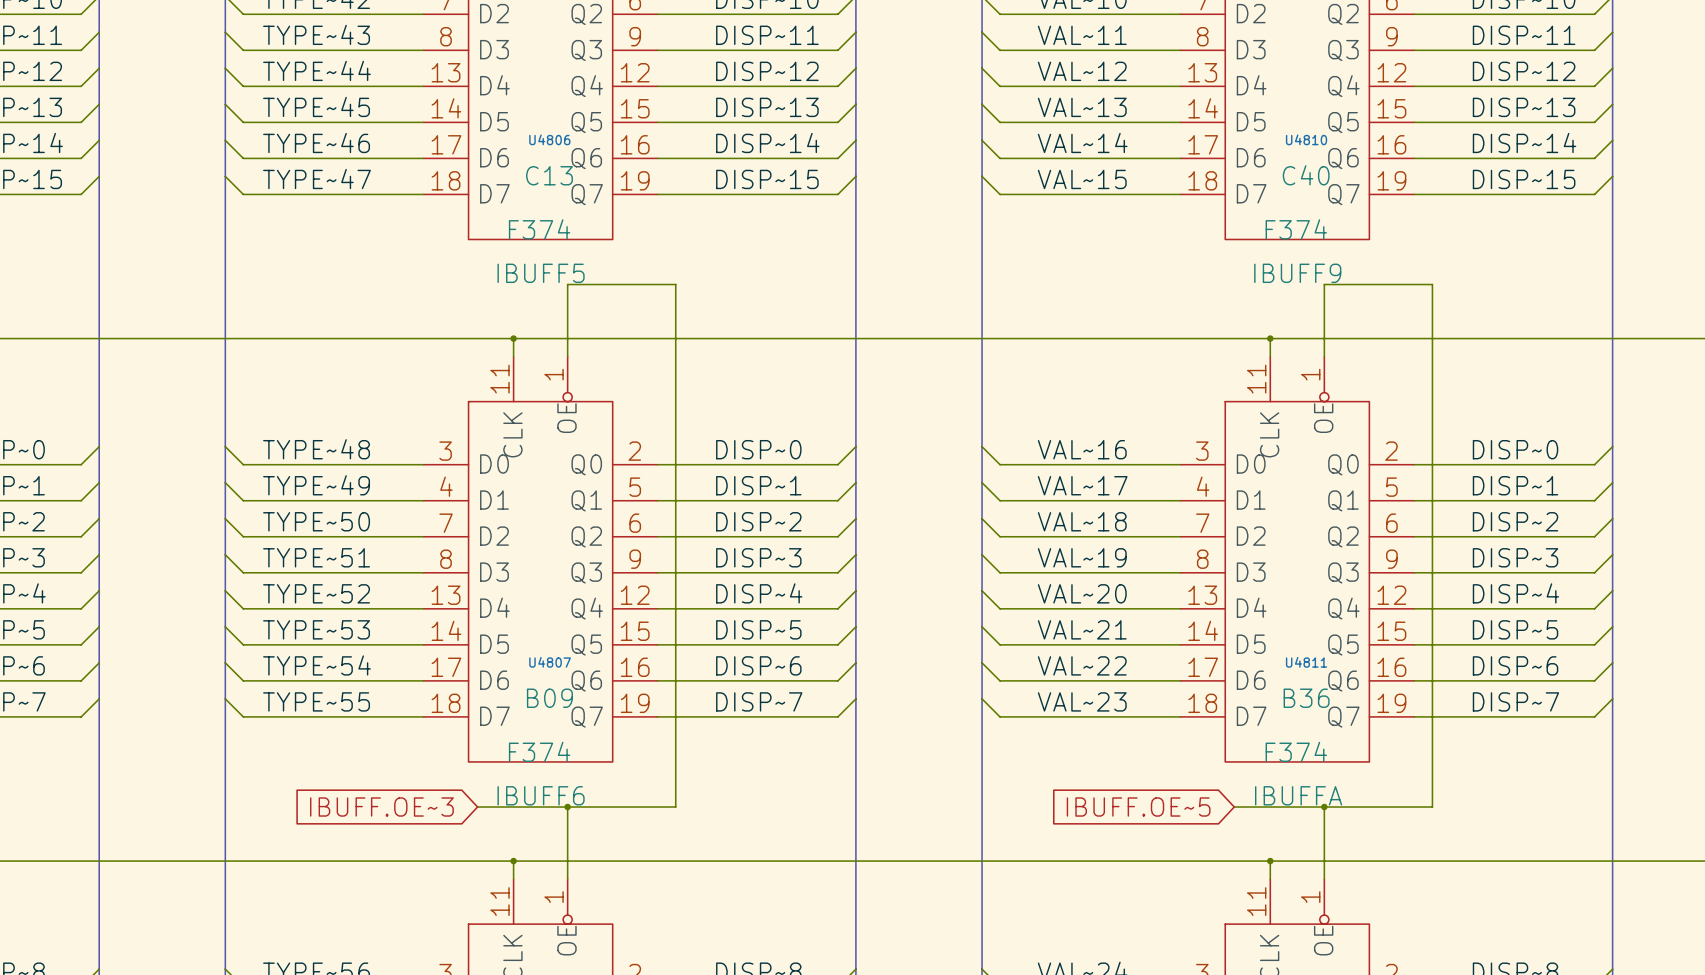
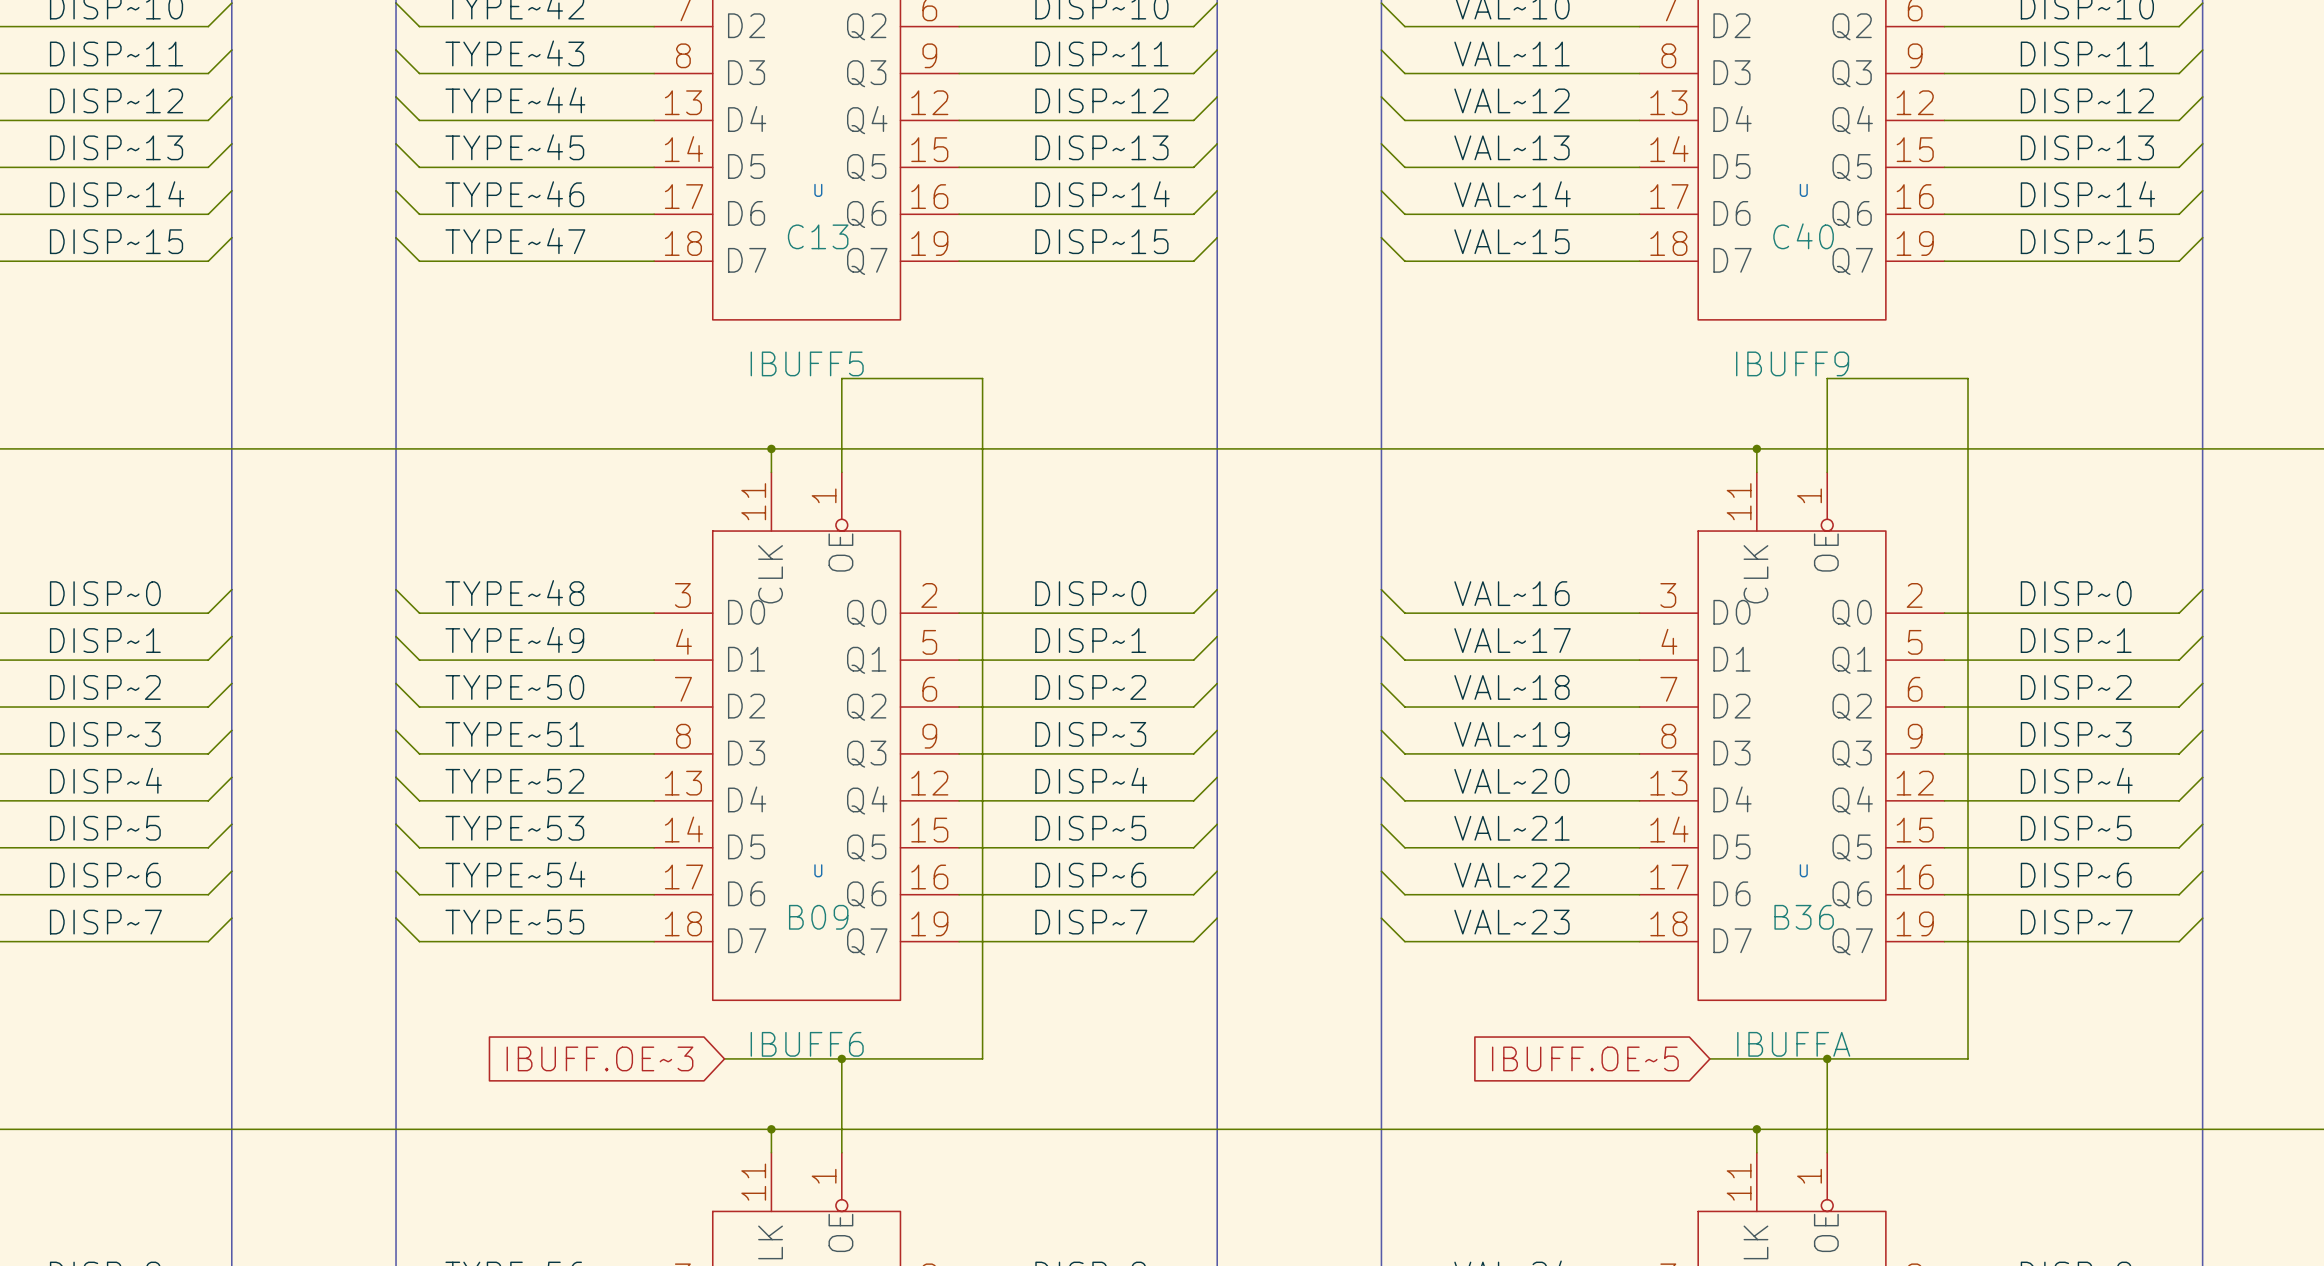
U4806 name: U4806 (549, 139) -> U (818, 190)
U4810 name: U4810 (1306, 139) -> U (1803, 190)
U4806 value: F374 (539, 229) -> none
U4810 value: F374 (1296, 229) -> none
U4807 name: U4807 (550, 662) -> U (818, 870)
U4811 name: U4811 (1306, 662) -> U (1803, 870)
U4807 value: F374 (539, 751) -> none
U4811 value: F374 (1296, 751) -> none

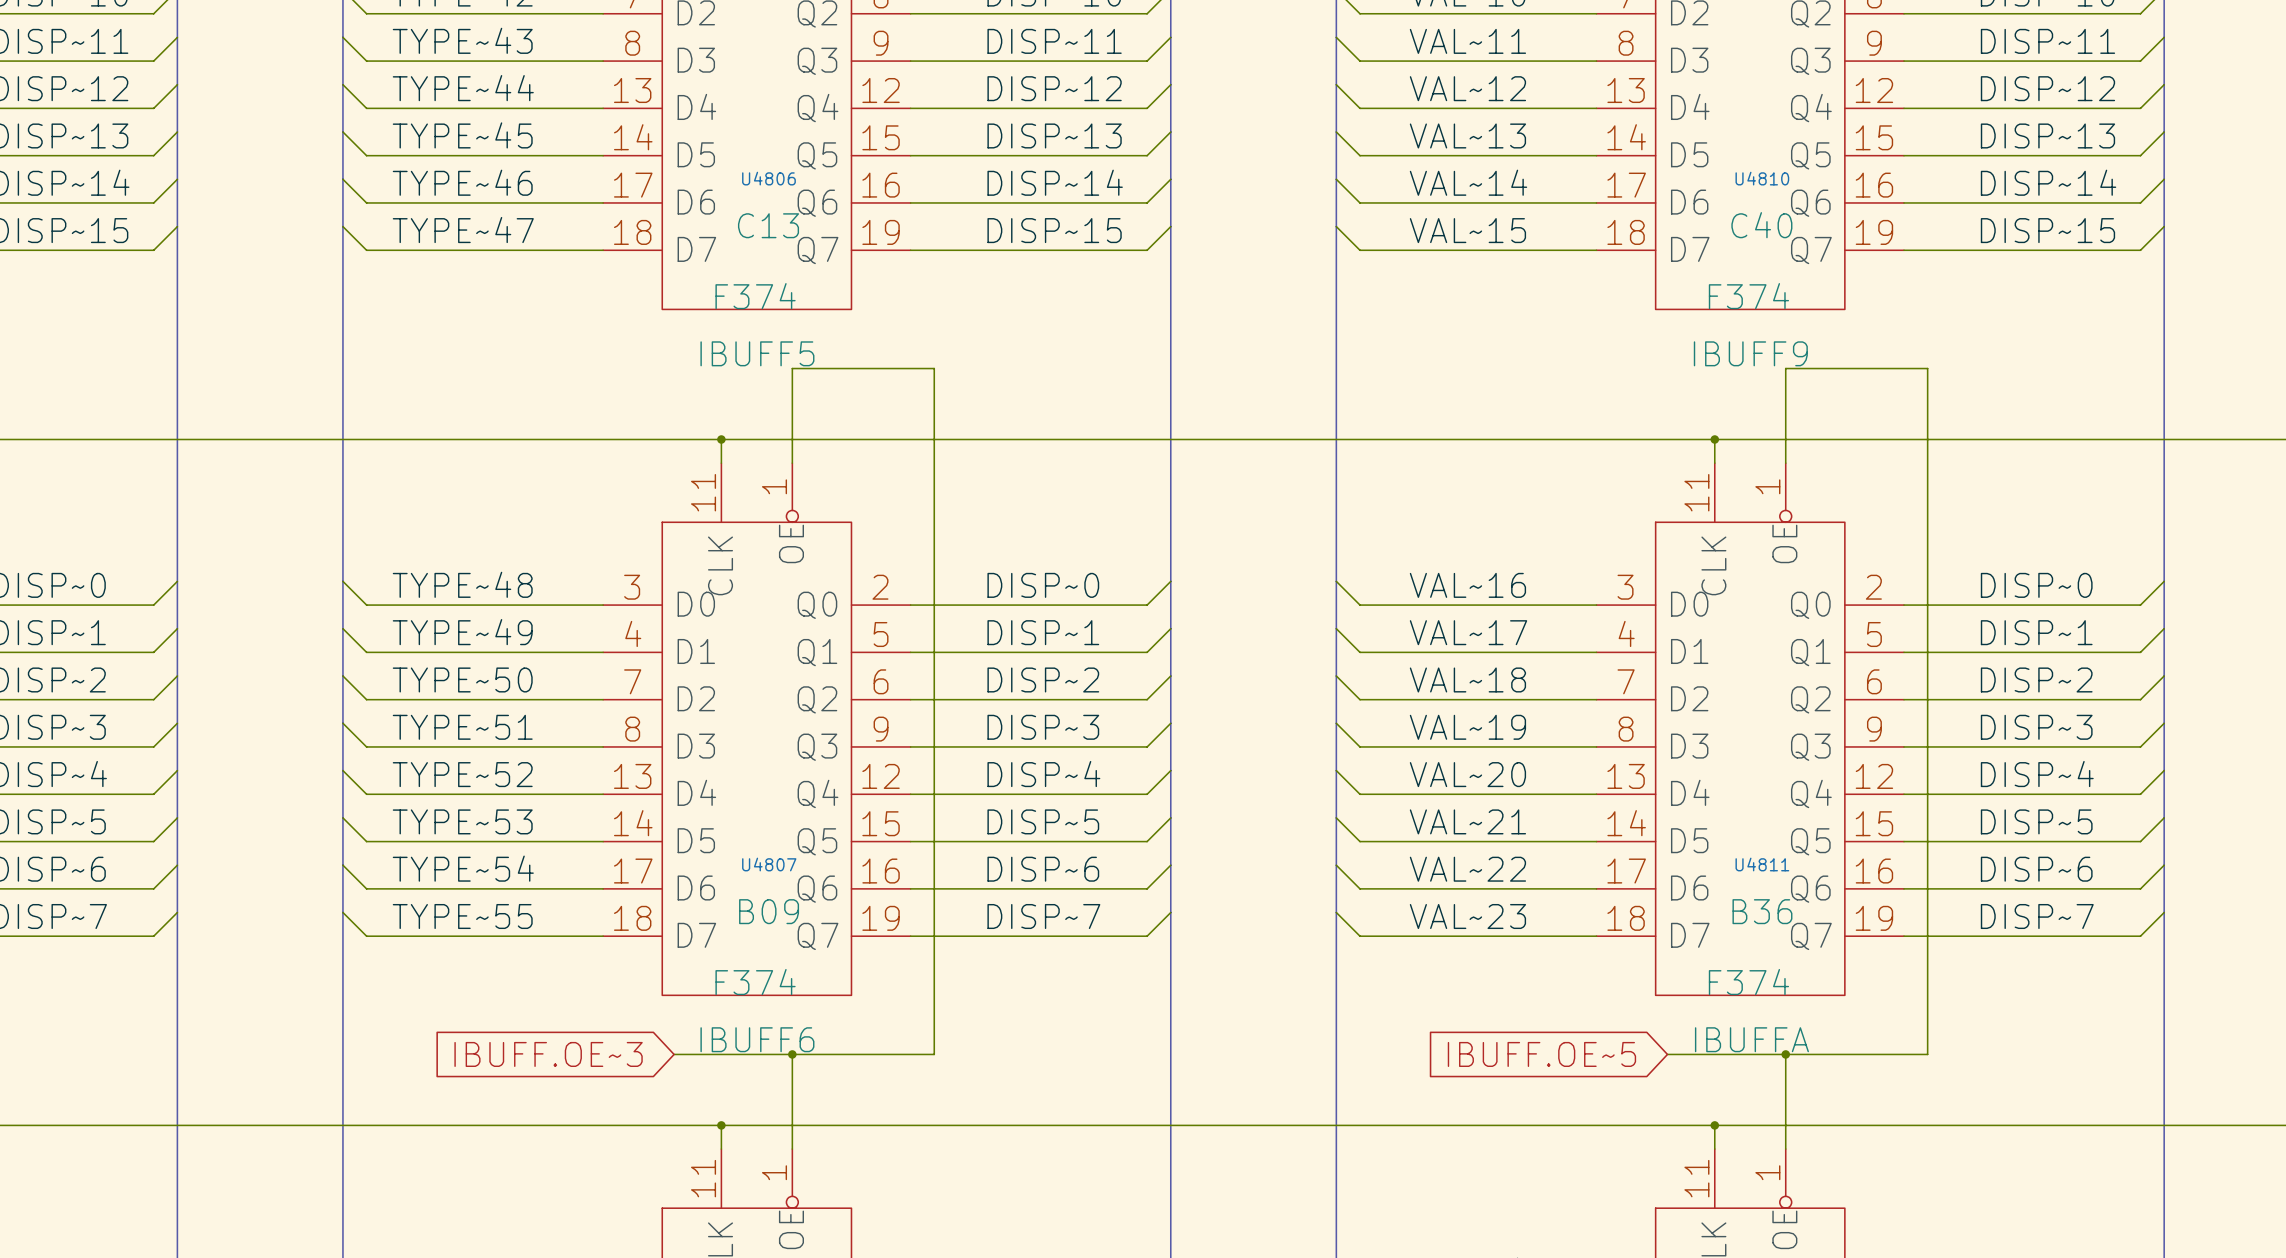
U name: U (818, 190) -> U4806 (768, 178)
U name: U (1803, 190) -> U4810 (1762, 178)
U value: none -> F374 (755, 296)
U value: none -> F374 (1748, 296)
U name: U (818, 870) -> U4807 (769, 864)
U name: U (1803, 870) -> U4811 (1762, 864)
U value: none -> F374 (755, 982)
U value: none -> F374 (1748, 982)

